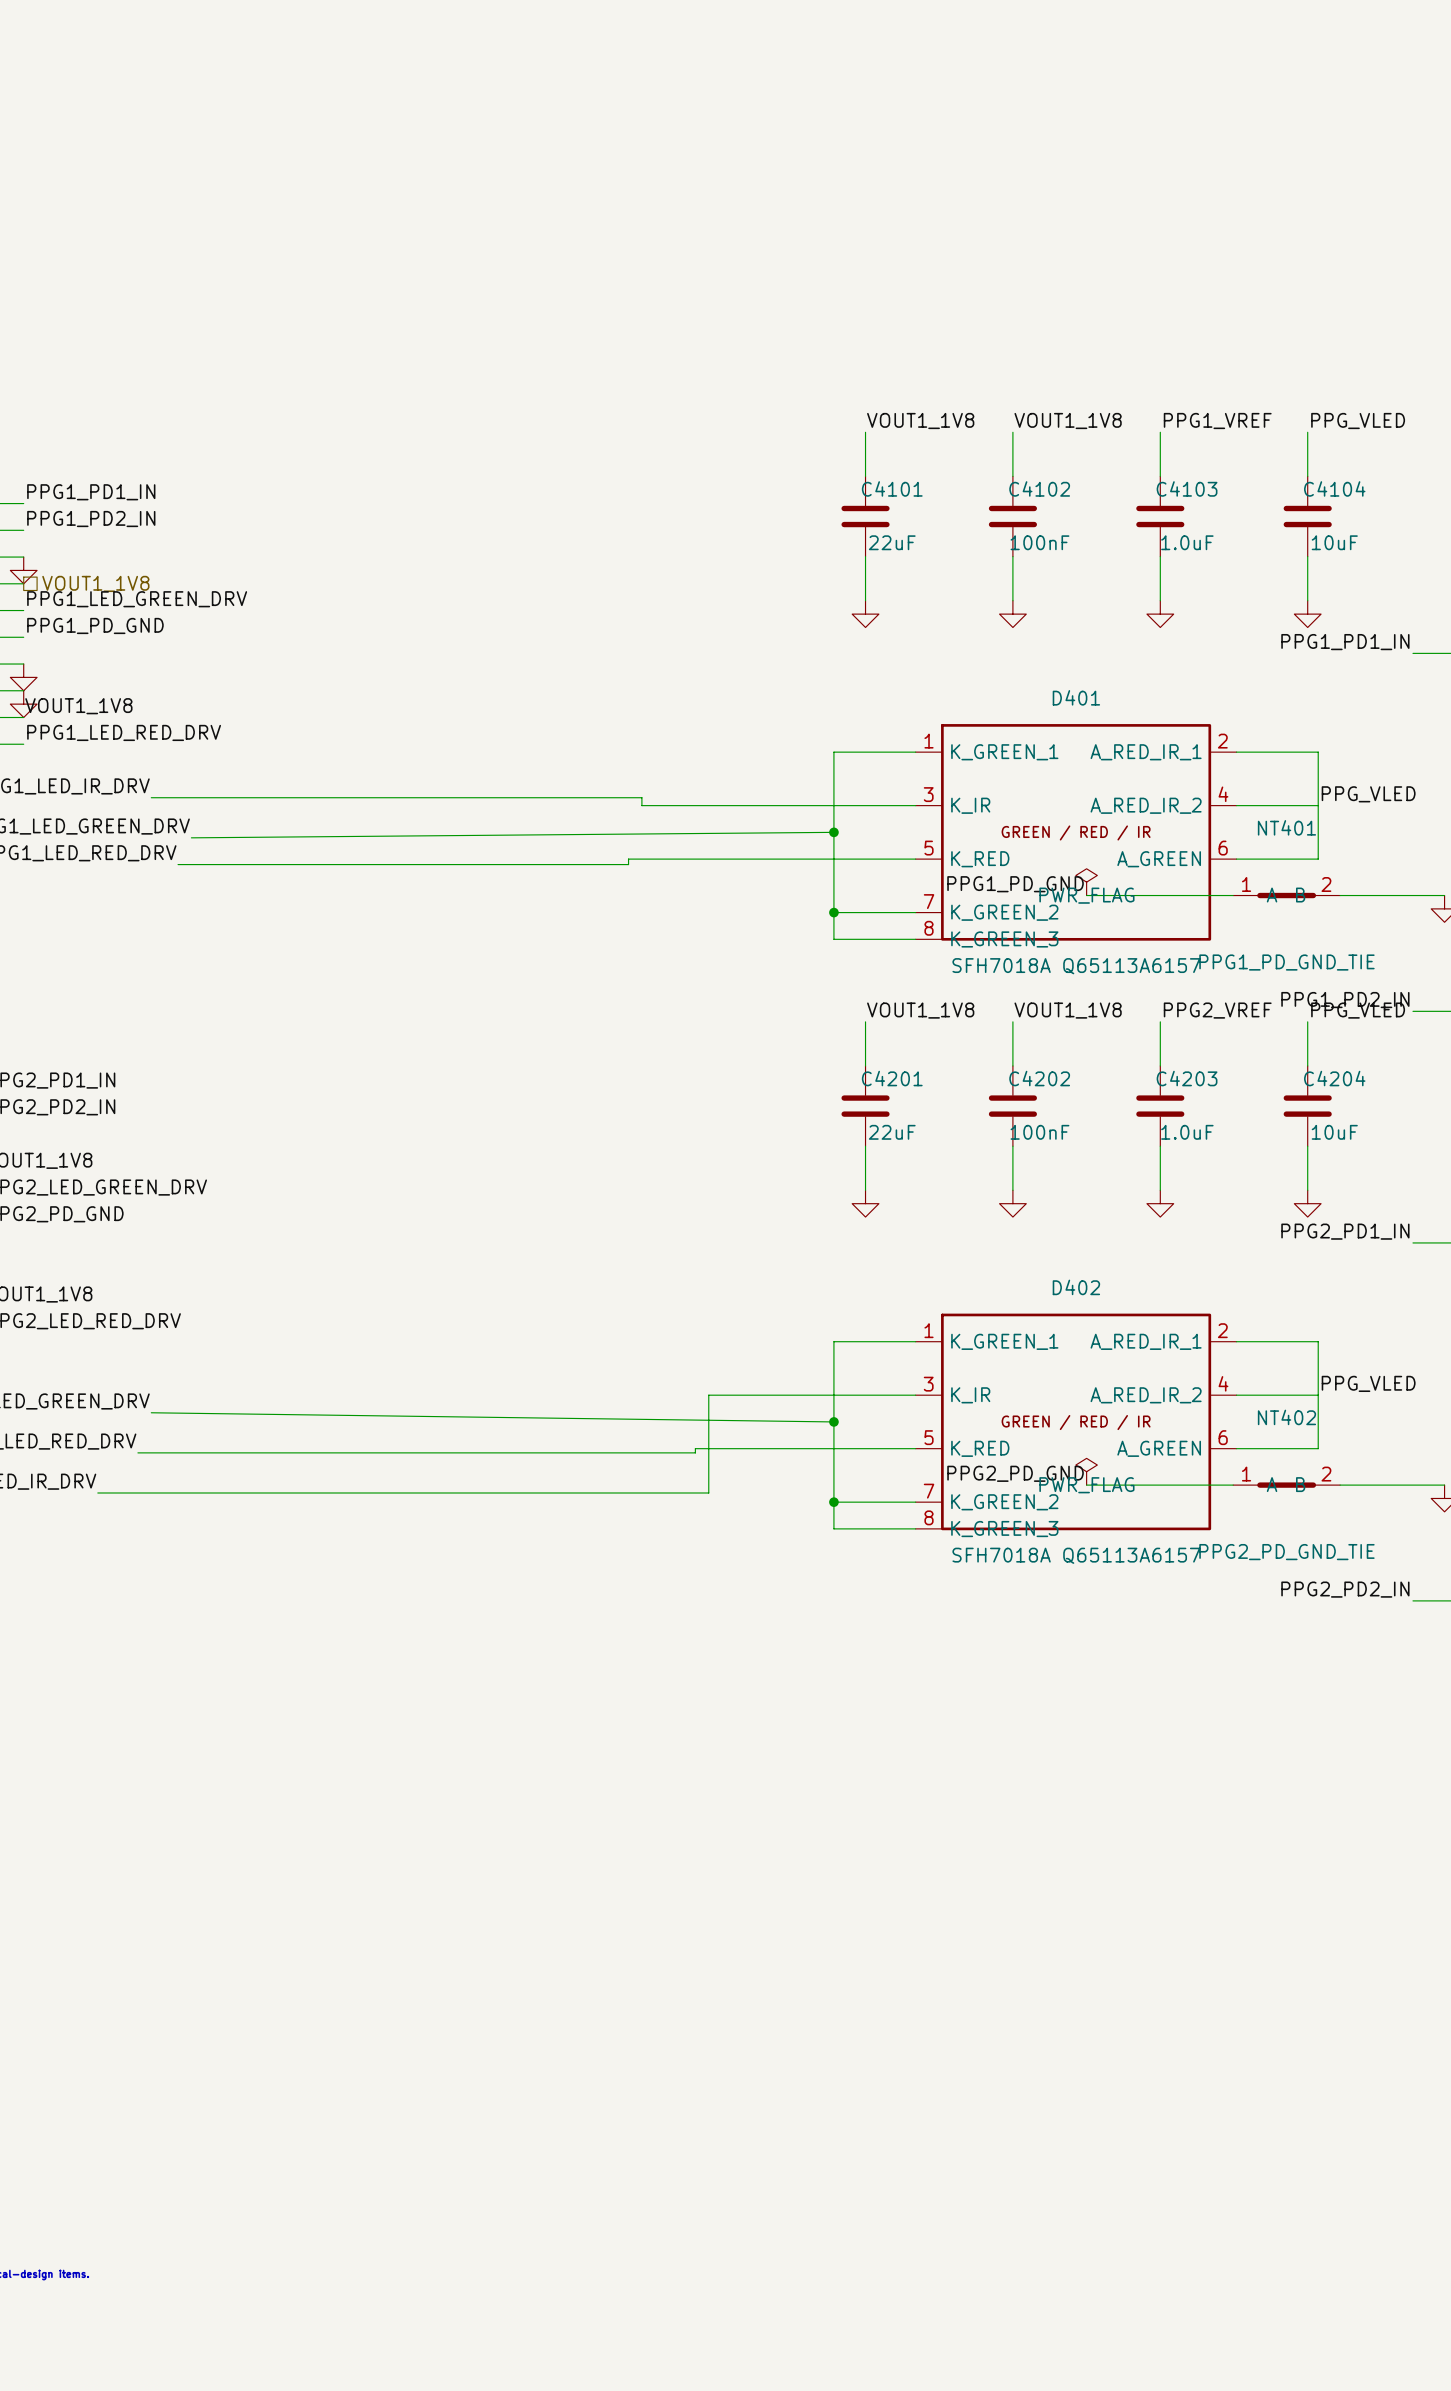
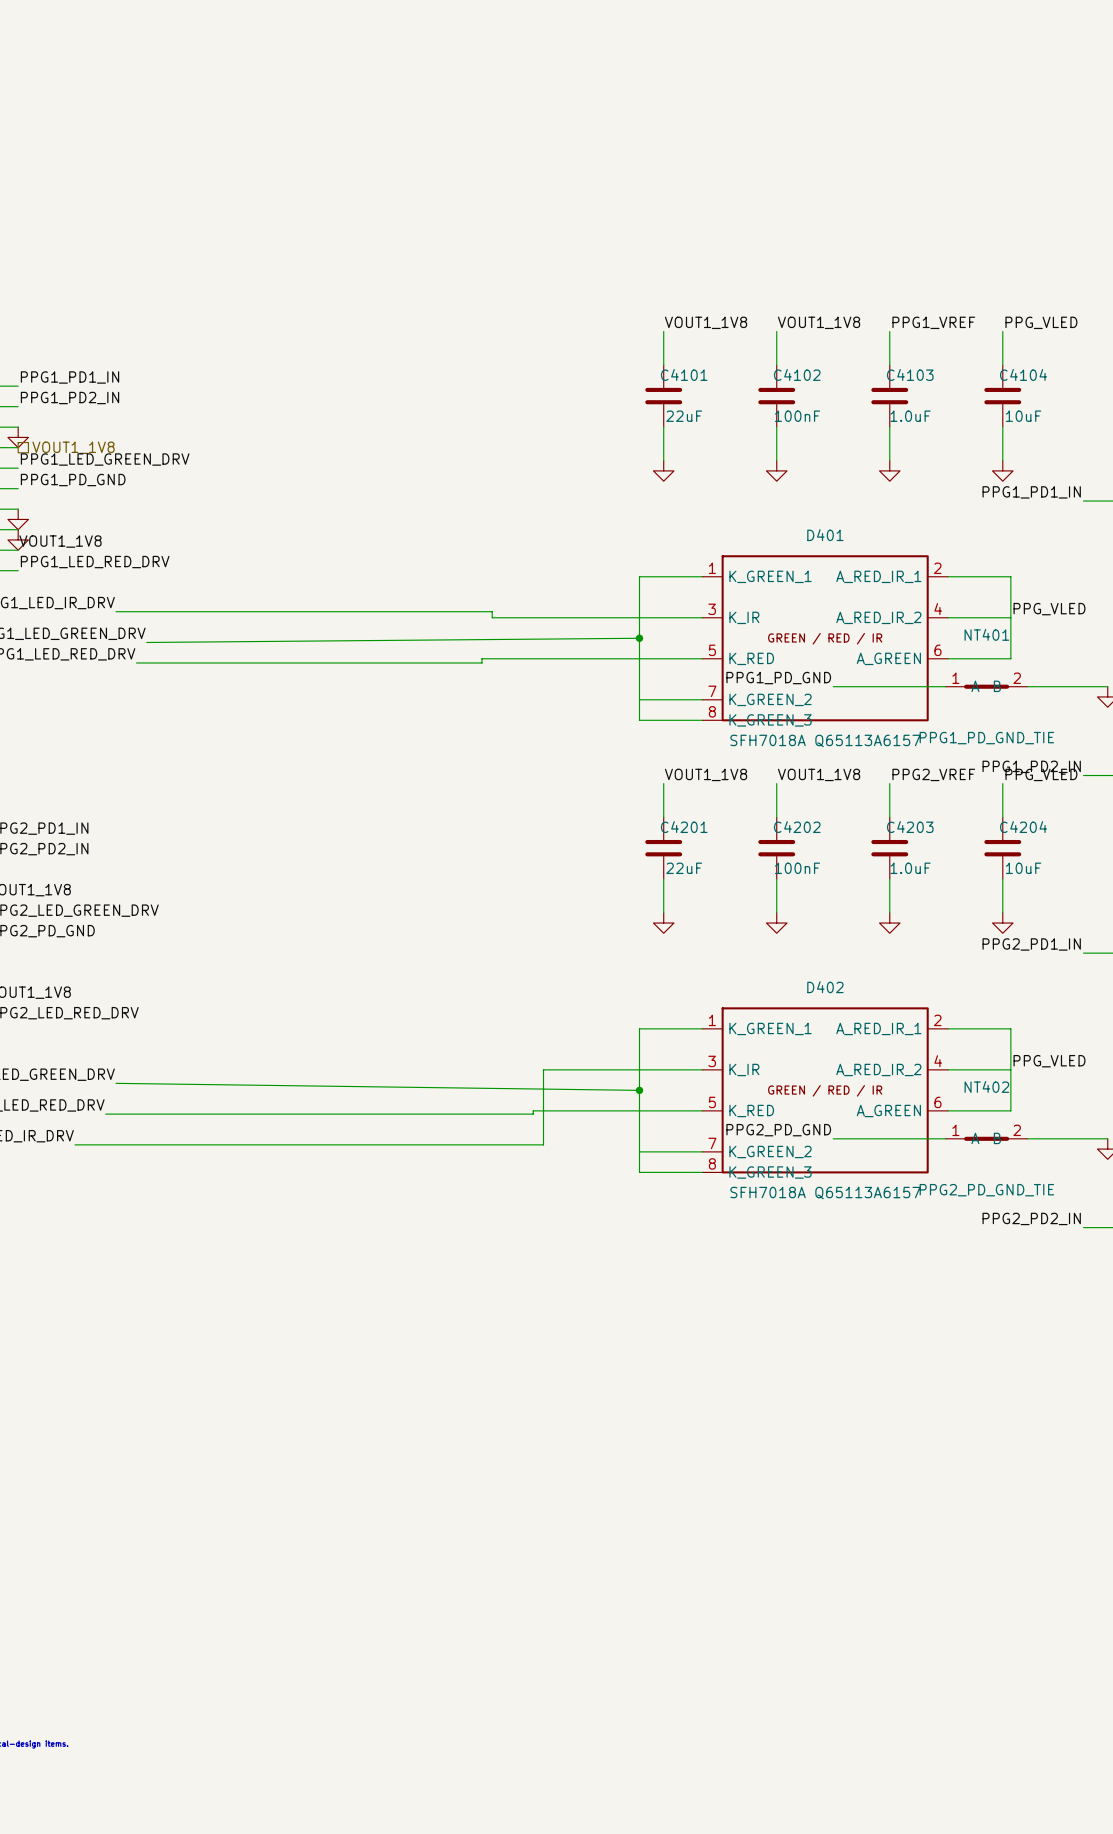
power symbol: PWR_FLAG (1086, 882) -> none
junction: (833, 912) -> none
power symbol: PWR_FLAG (1086, 1471) -> none
junction: (833, 1502) -> none

